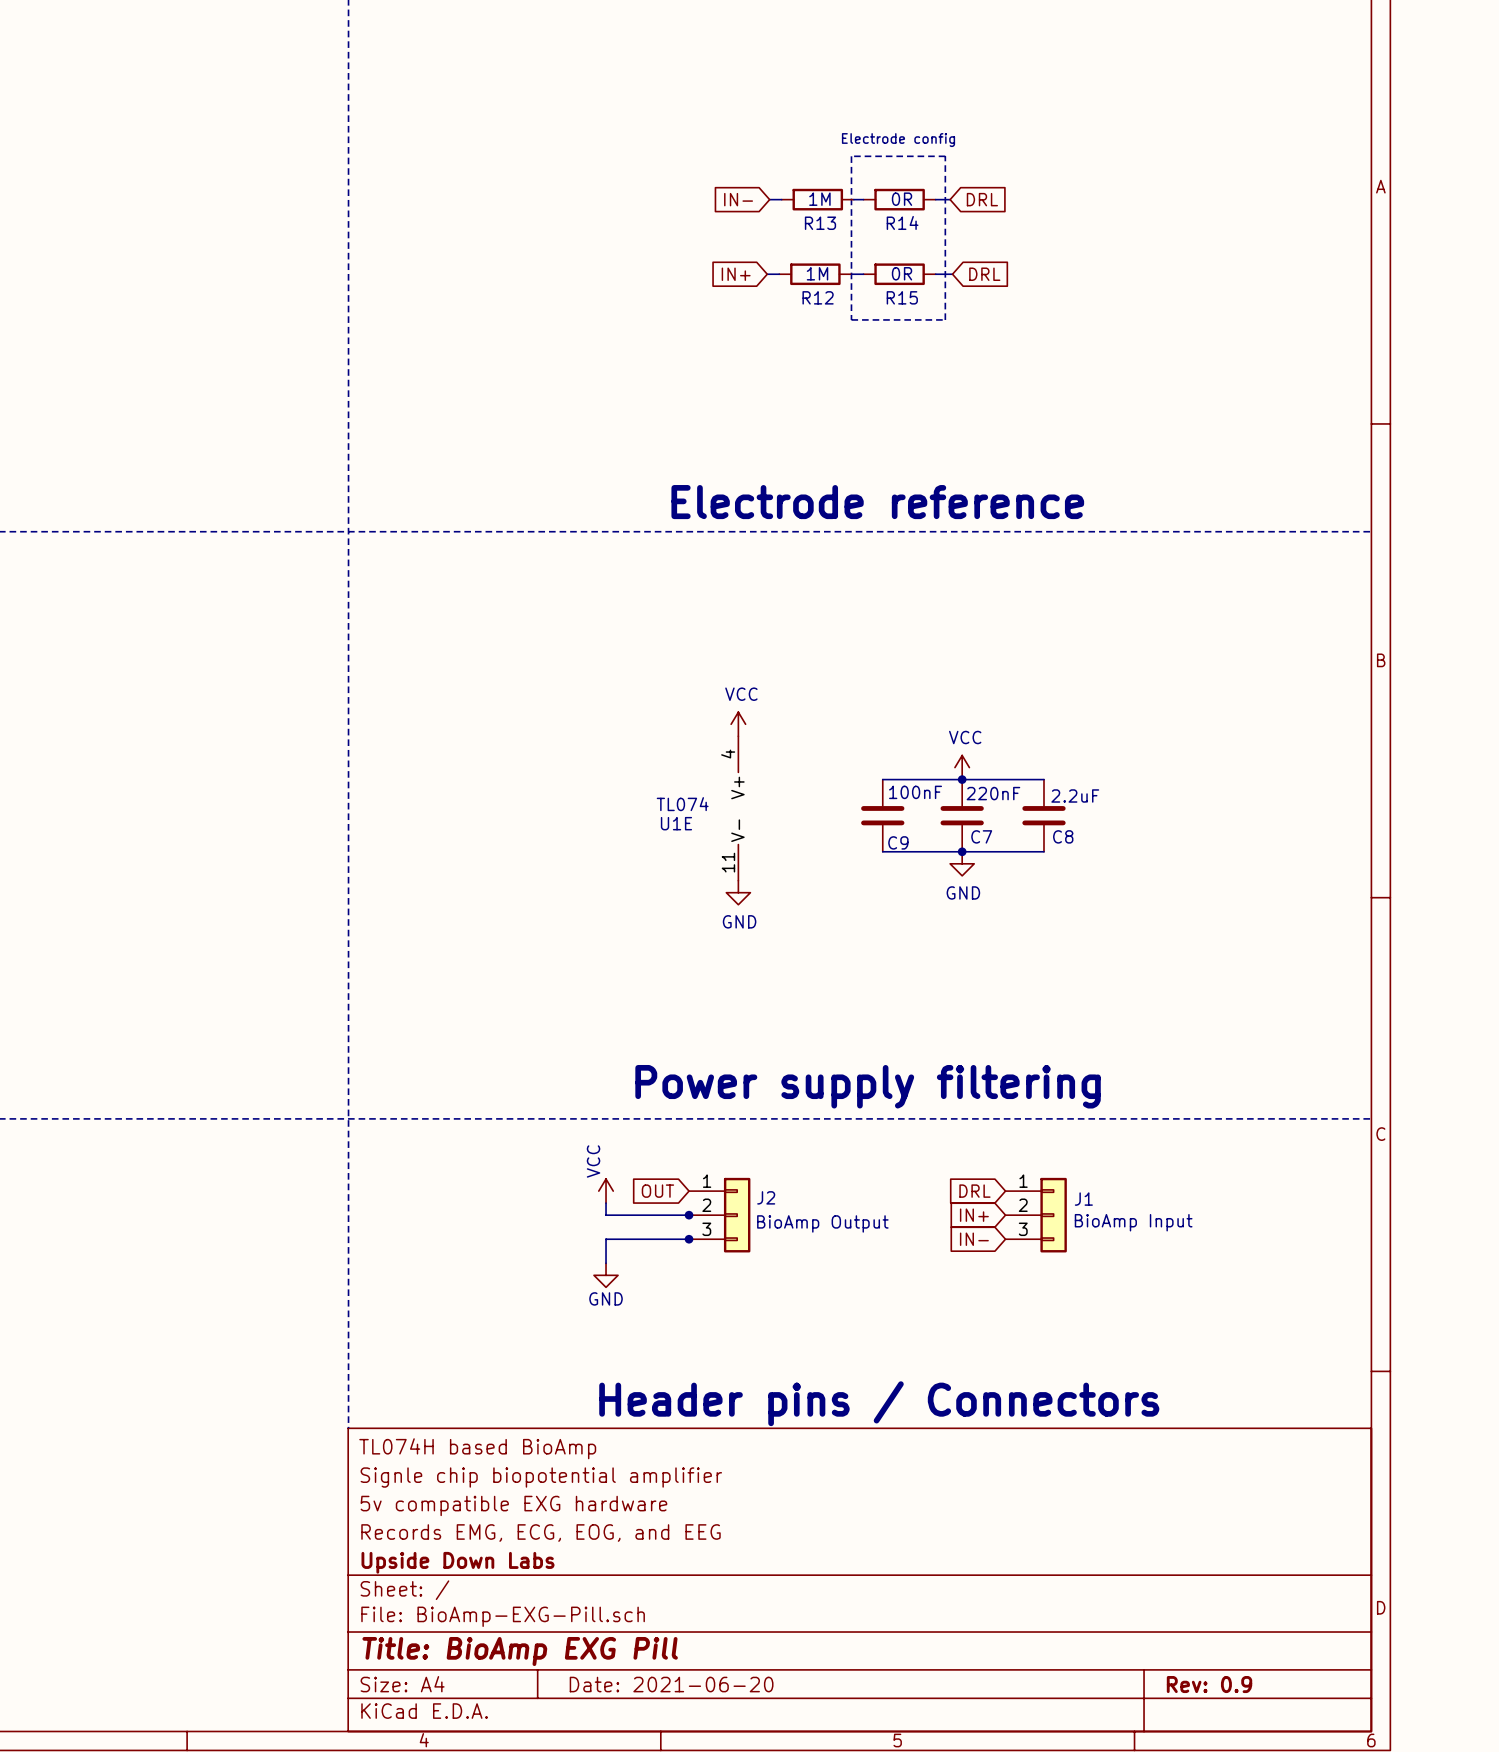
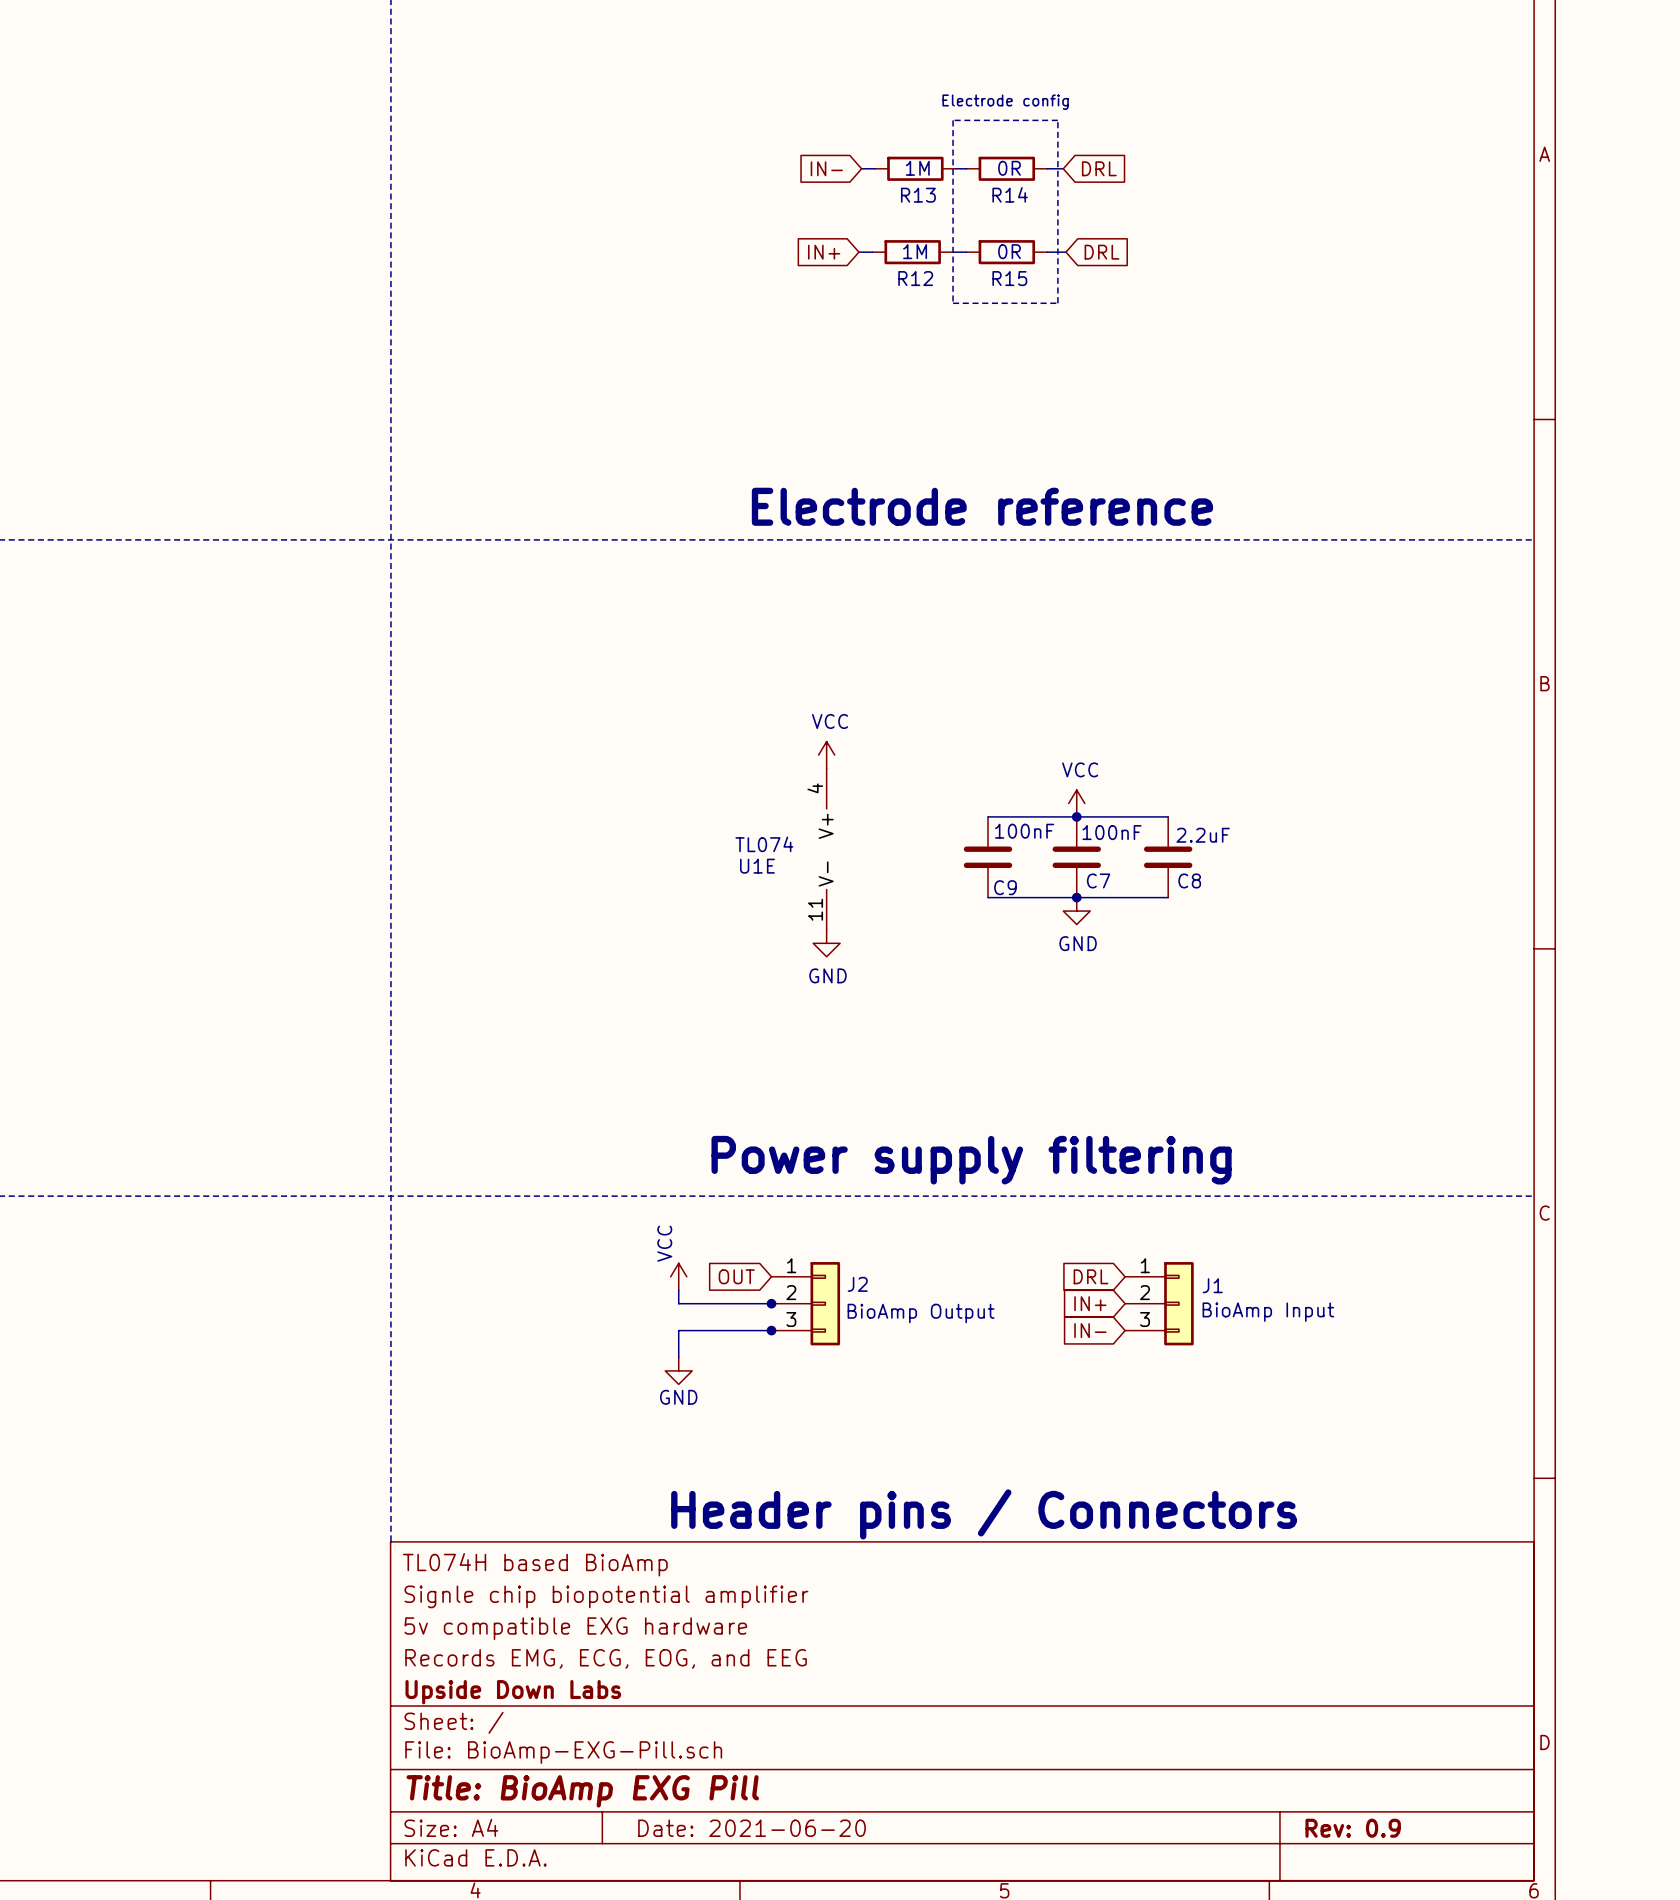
C7 value: 220nF (993, 793) -> 100nF (1112, 832)

